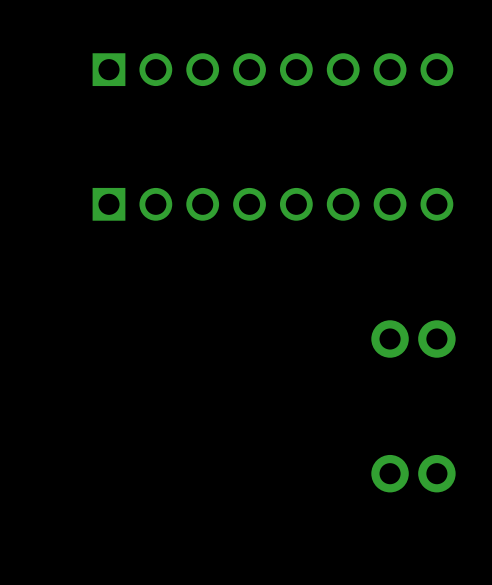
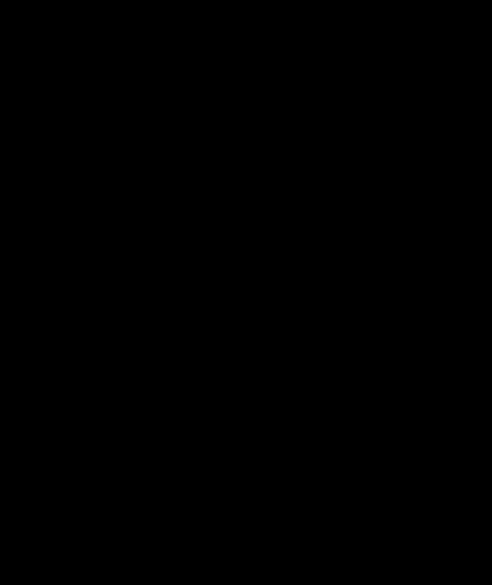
part: (272, 69) -> none
part: (272, 204) -> none
part: (413, 339) -> none
part: (413, 473) -> none

